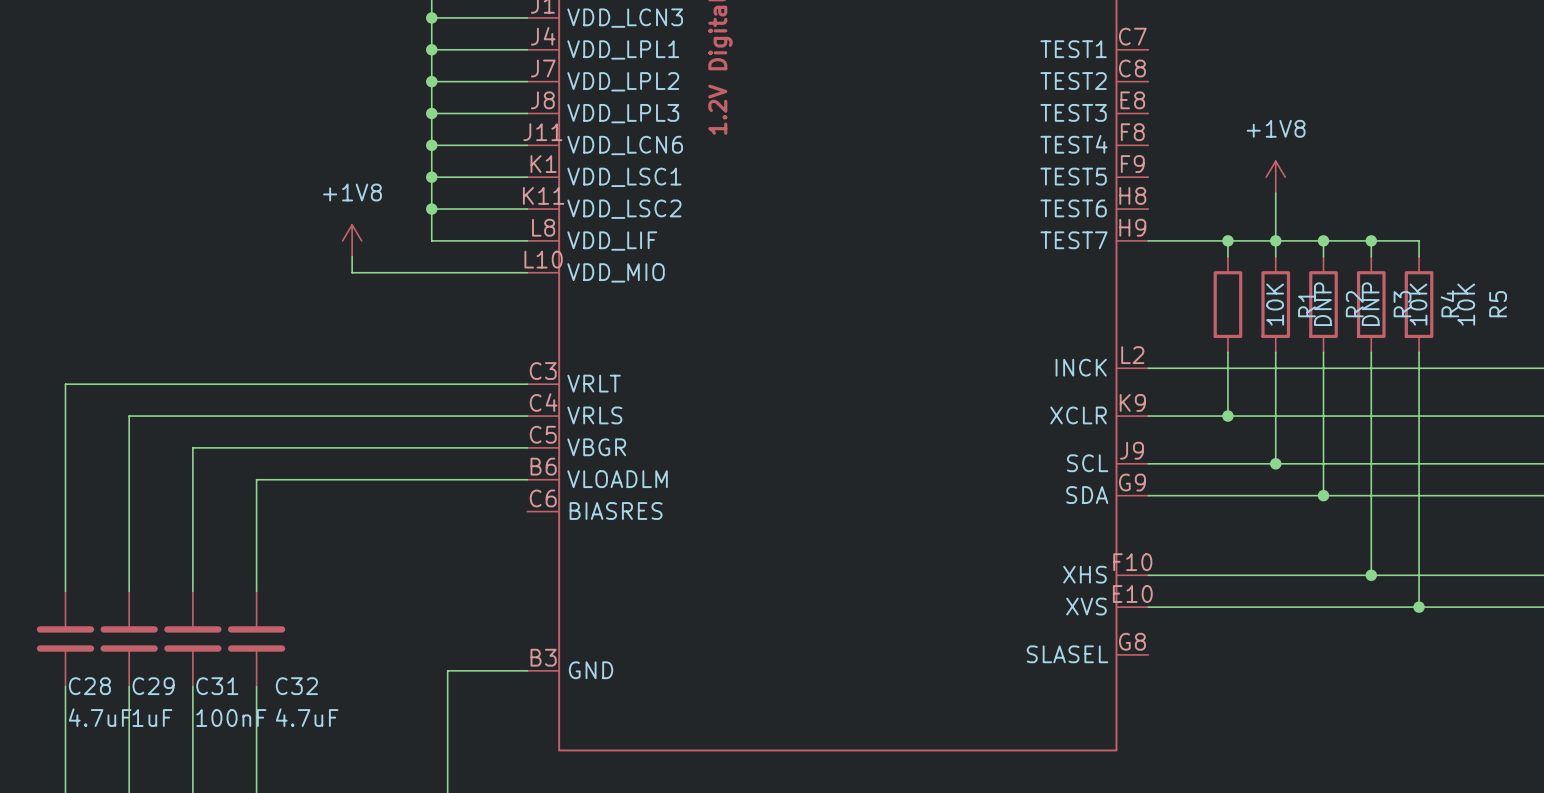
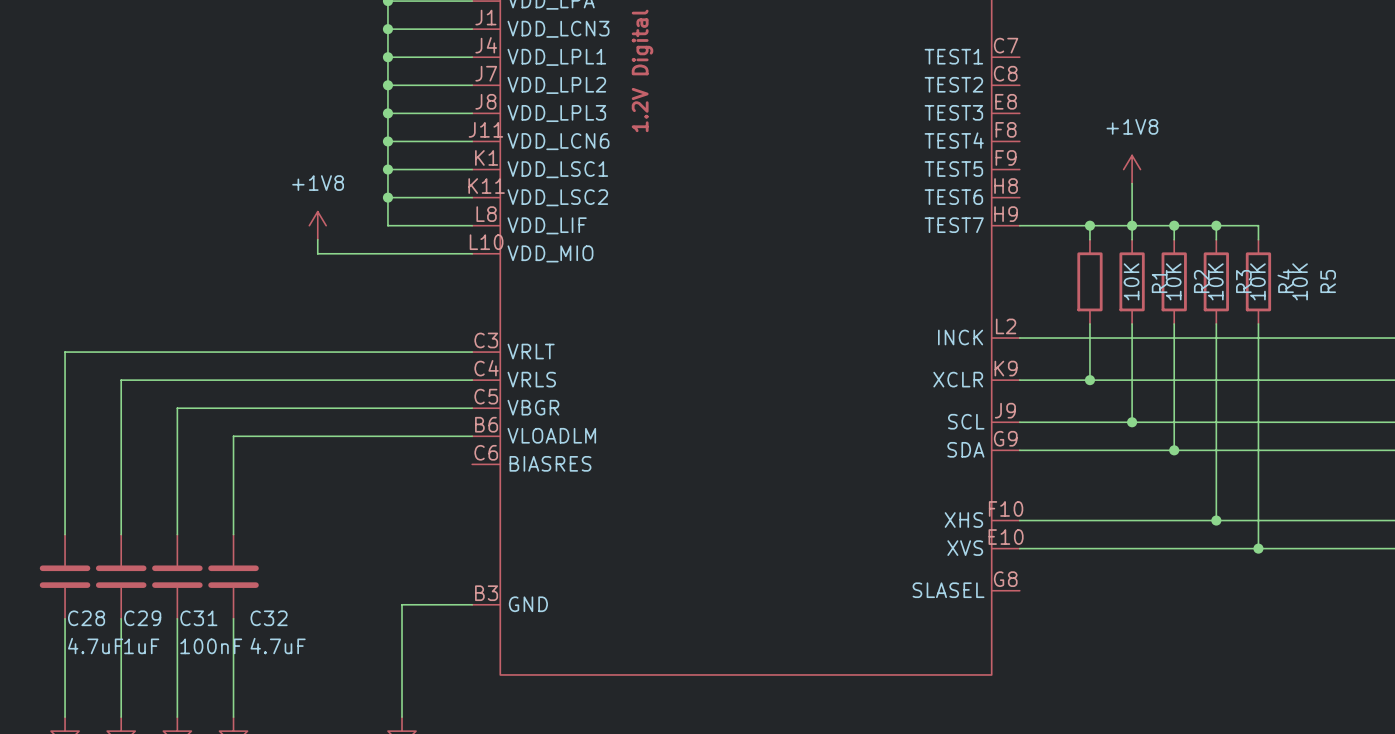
R2 value: DNP (1322, 304) -> 10K (1173, 281)
R3 value: DNP (1370, 304) -> 10K (1215, 281)

